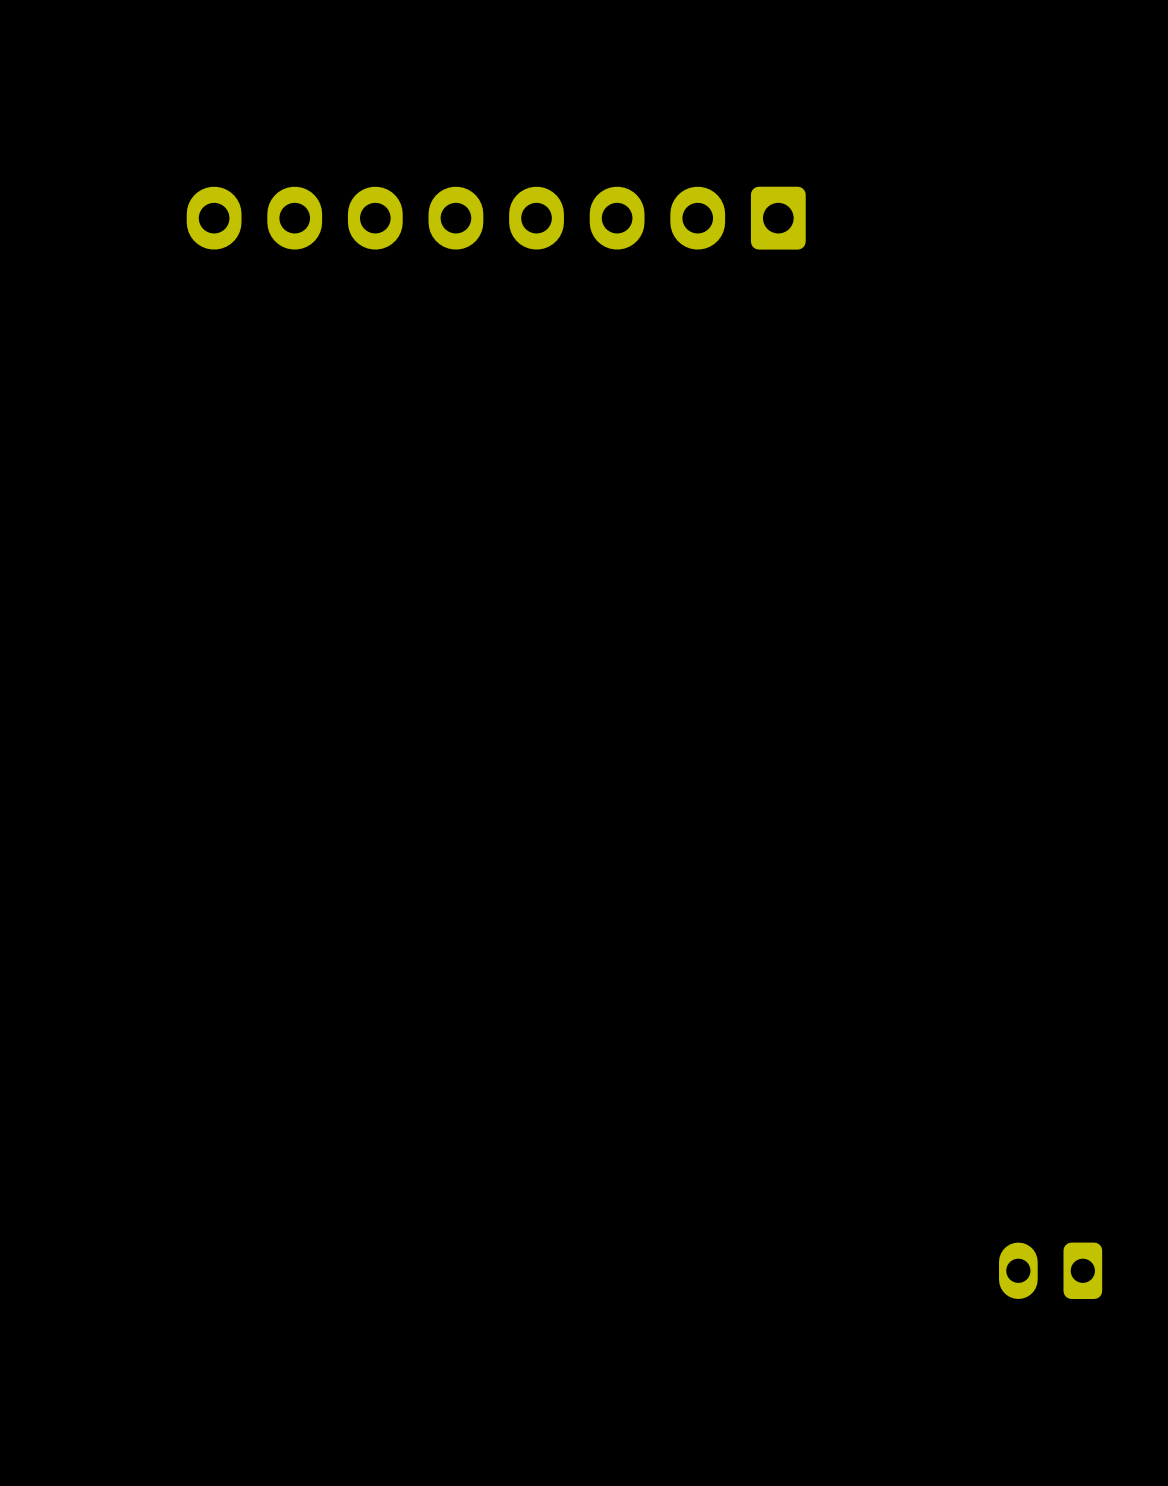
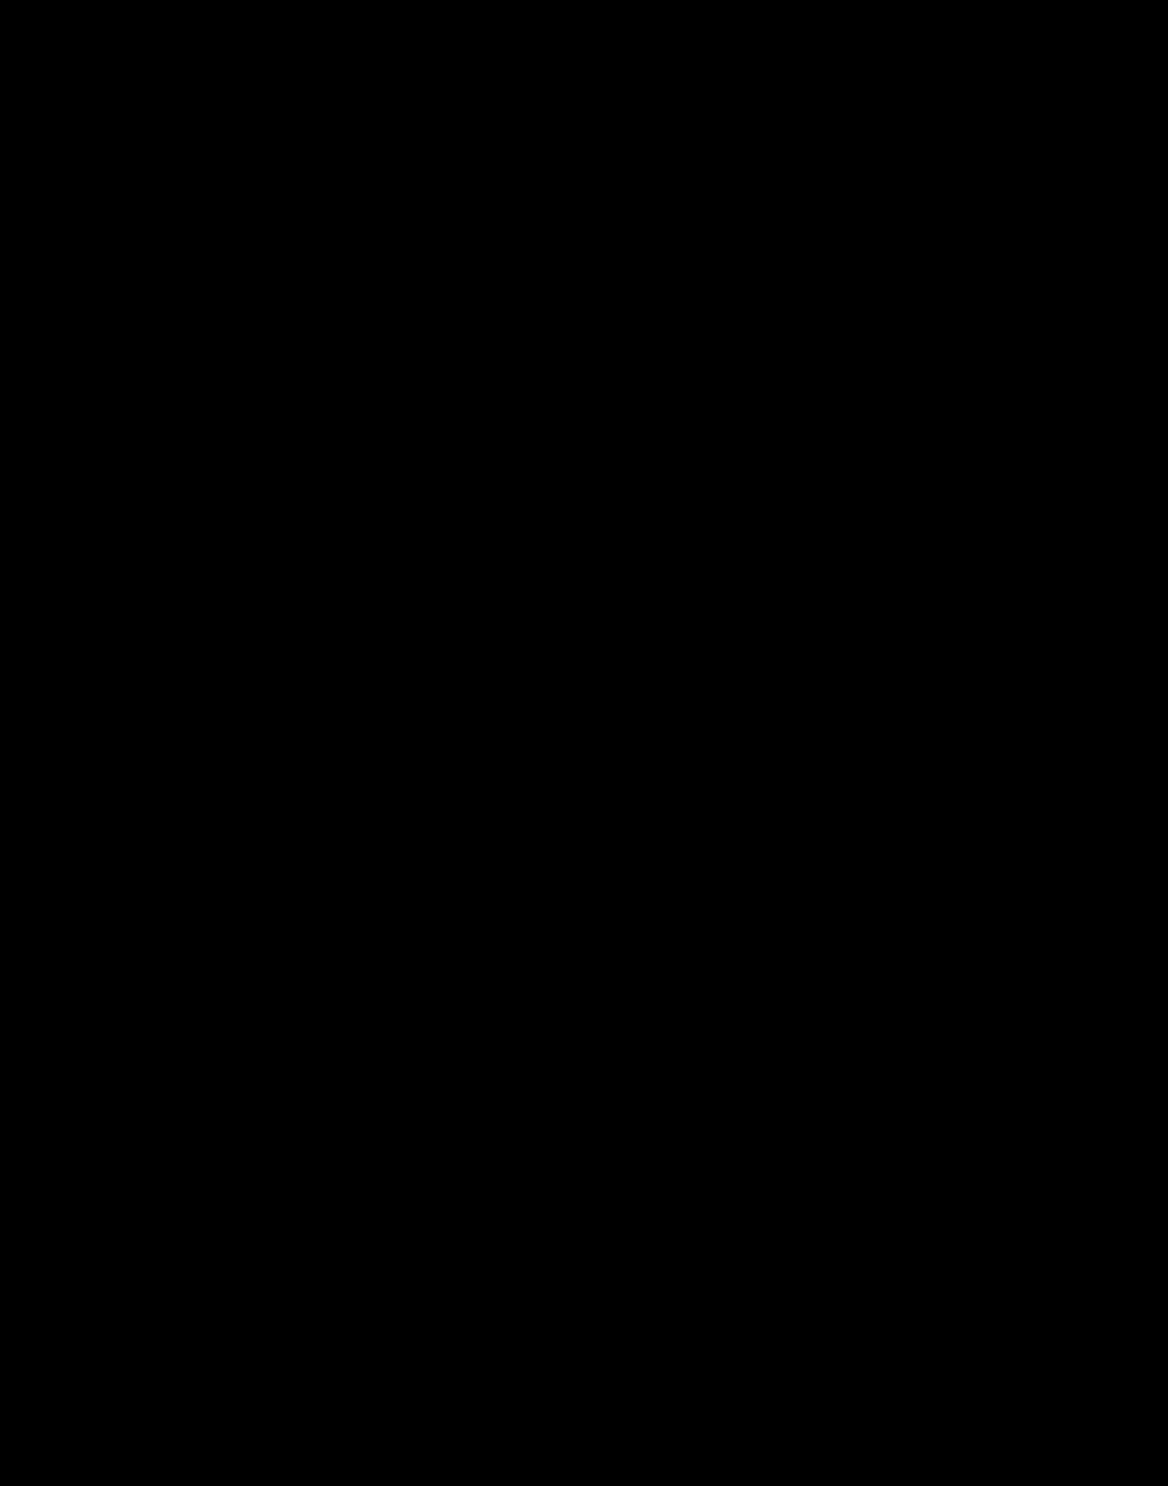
part: (496, 218) -> none
part: (1050, 1270) -> none

